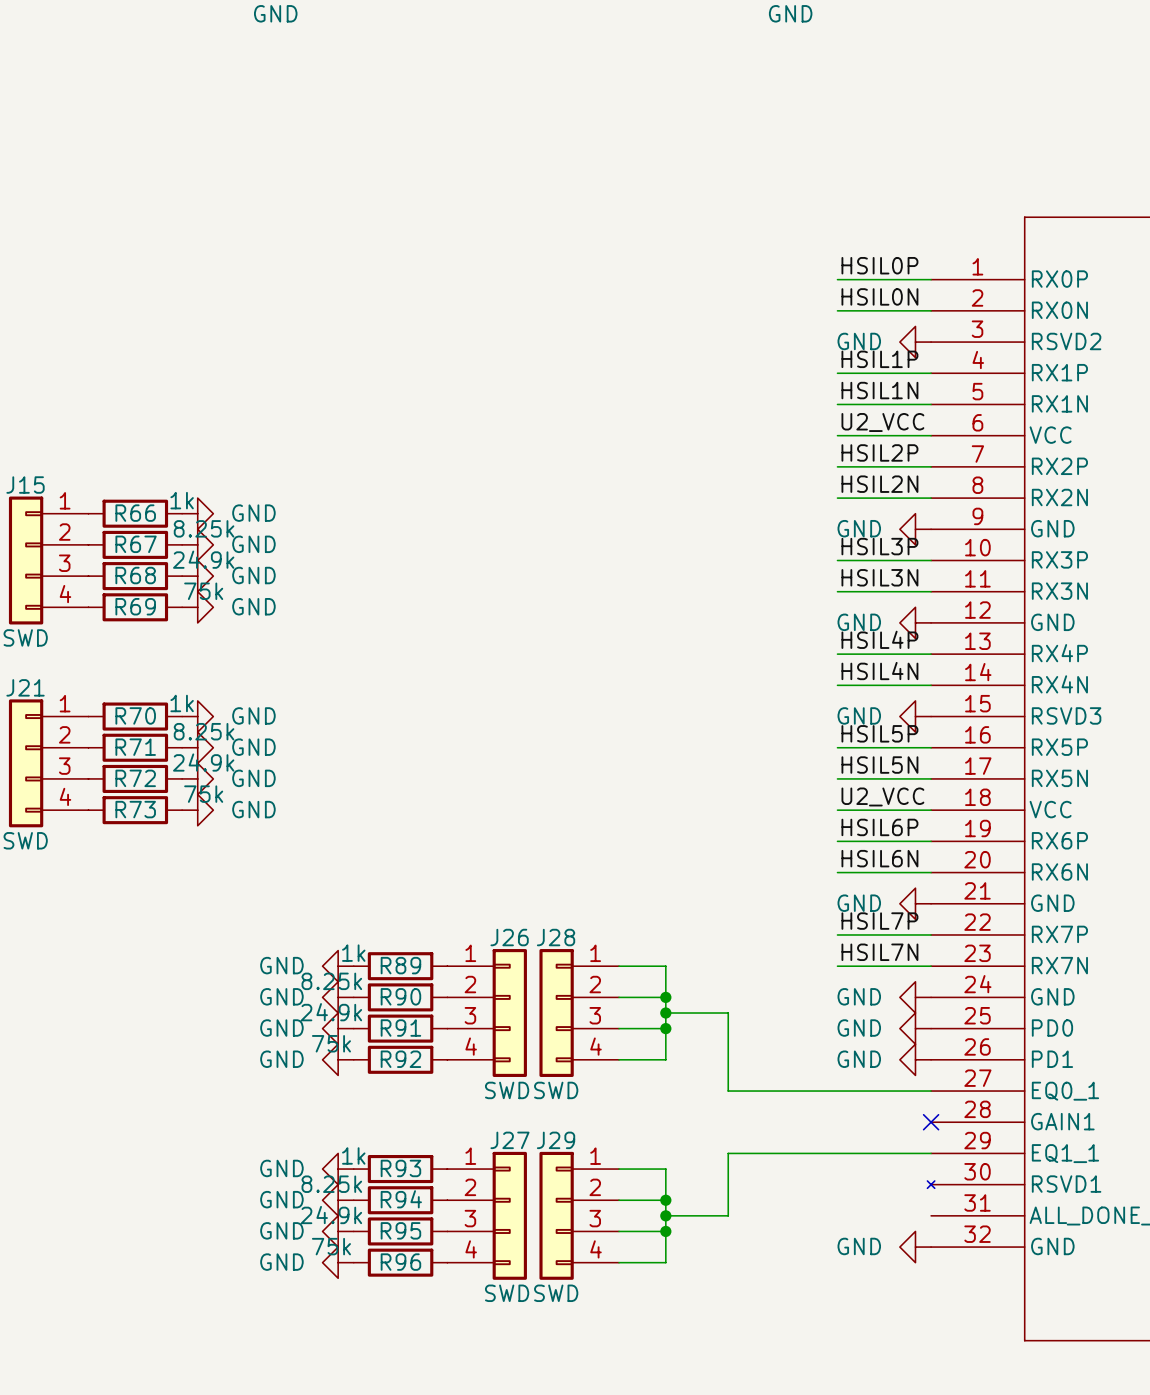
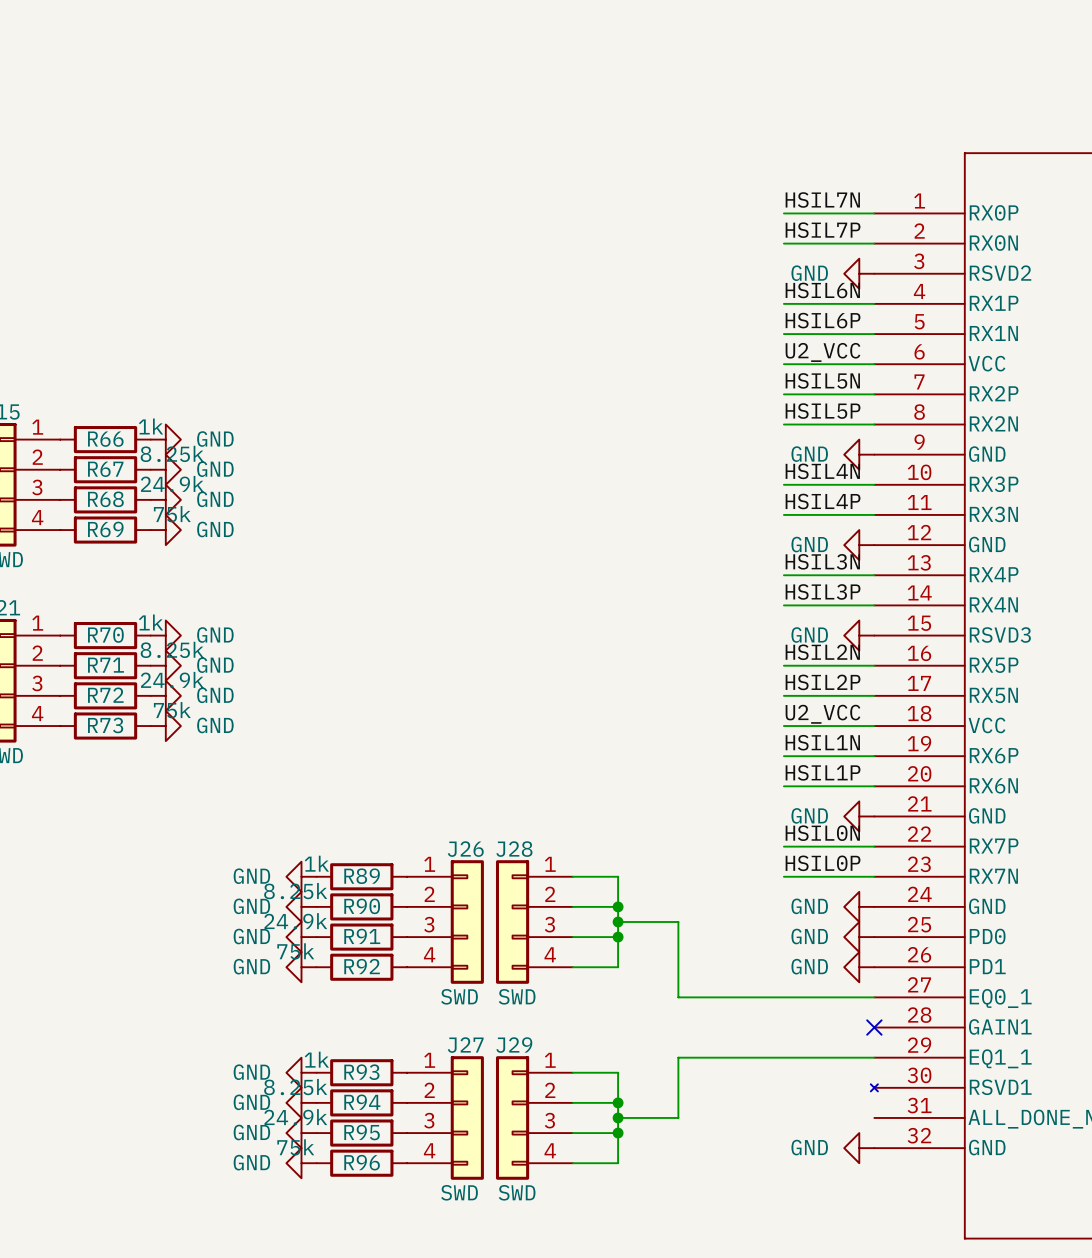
label: HSIL0P (879, 265) -> HSIL7N (822, 200)
label: HSIL0N (879, 296) -> HSIL7P (823, 230)
label: HSIL1P (879, 359) -> HSIL6N (822, 290)
label: HSIL1N (879, 390) -> HSIL6P (823, 320)
label: HSIL2P (879, 452) -> HSIL5N (822, 380)
label: HSIL2N (879, 484) -> HSIL5P (823, 411)
label: HSIL3P (879, 546) -> HSIL4N (822, 471)
label: HSIL3N (879, 577) -> HSIL4P (823, 501)
label: HSIL4P (879, 639) -> HSIL3N (822, 561)
label: HSIL4N (879, 671) -> HSIL3P (823, 591)
label: HSIL5P (879, 733) -> HSIL2N (822, 652)
label: HSIL5N (879, 765) -> HSIL2P (823, 682)
label: HSIL6P (879, 827) -> HSIL1N (822, 742)
label: HSIL6N (879, 858) -> HSIL1P (823, 772)
label: HSIL7P (879, 921) -> HSIL0N (822, 833)
label: HSIL7N (879, 952) -> HSIL0P (823, 863)

